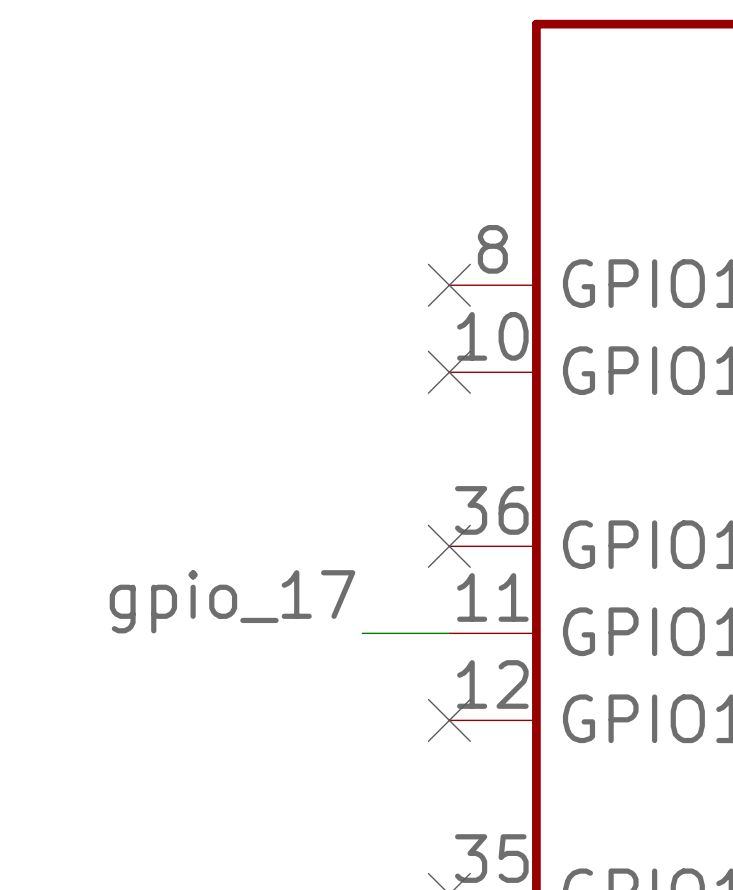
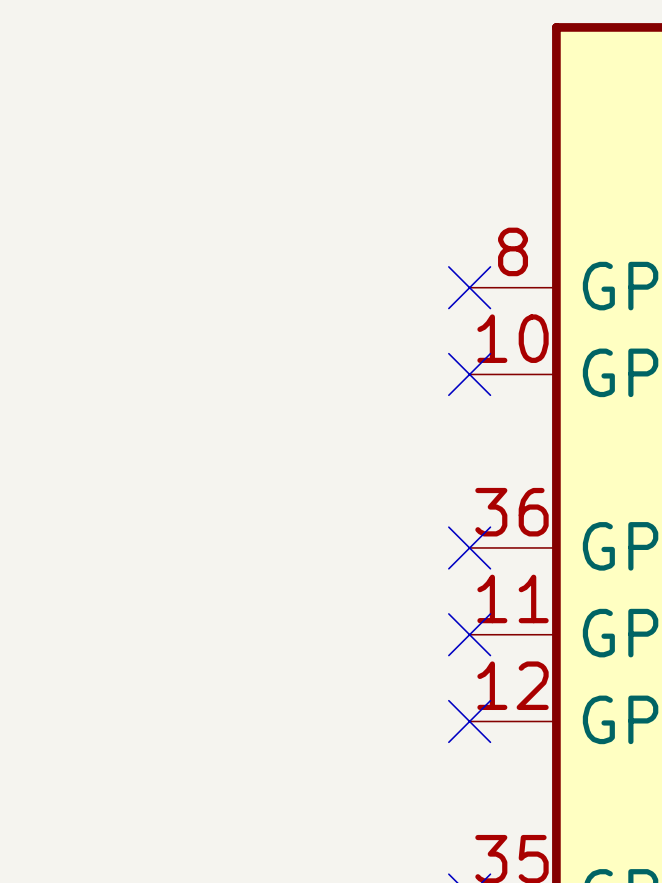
label: gpio_17 (232, 601) -> none
wire: (362, 633) (449, 633) -> none
no-connect mark: none -> (469, 634)

